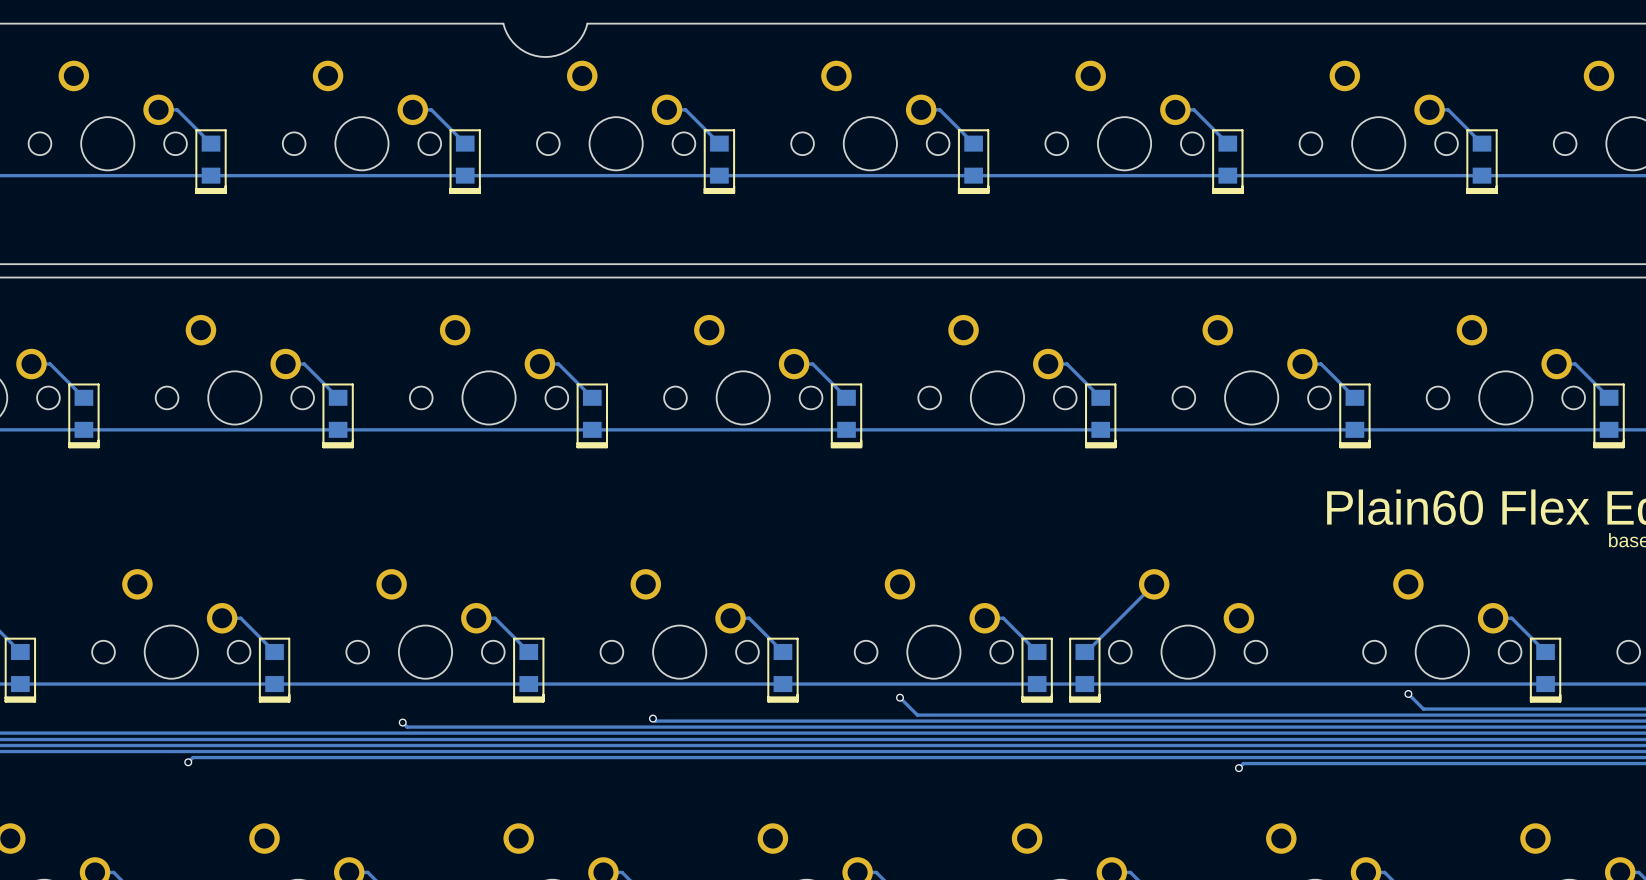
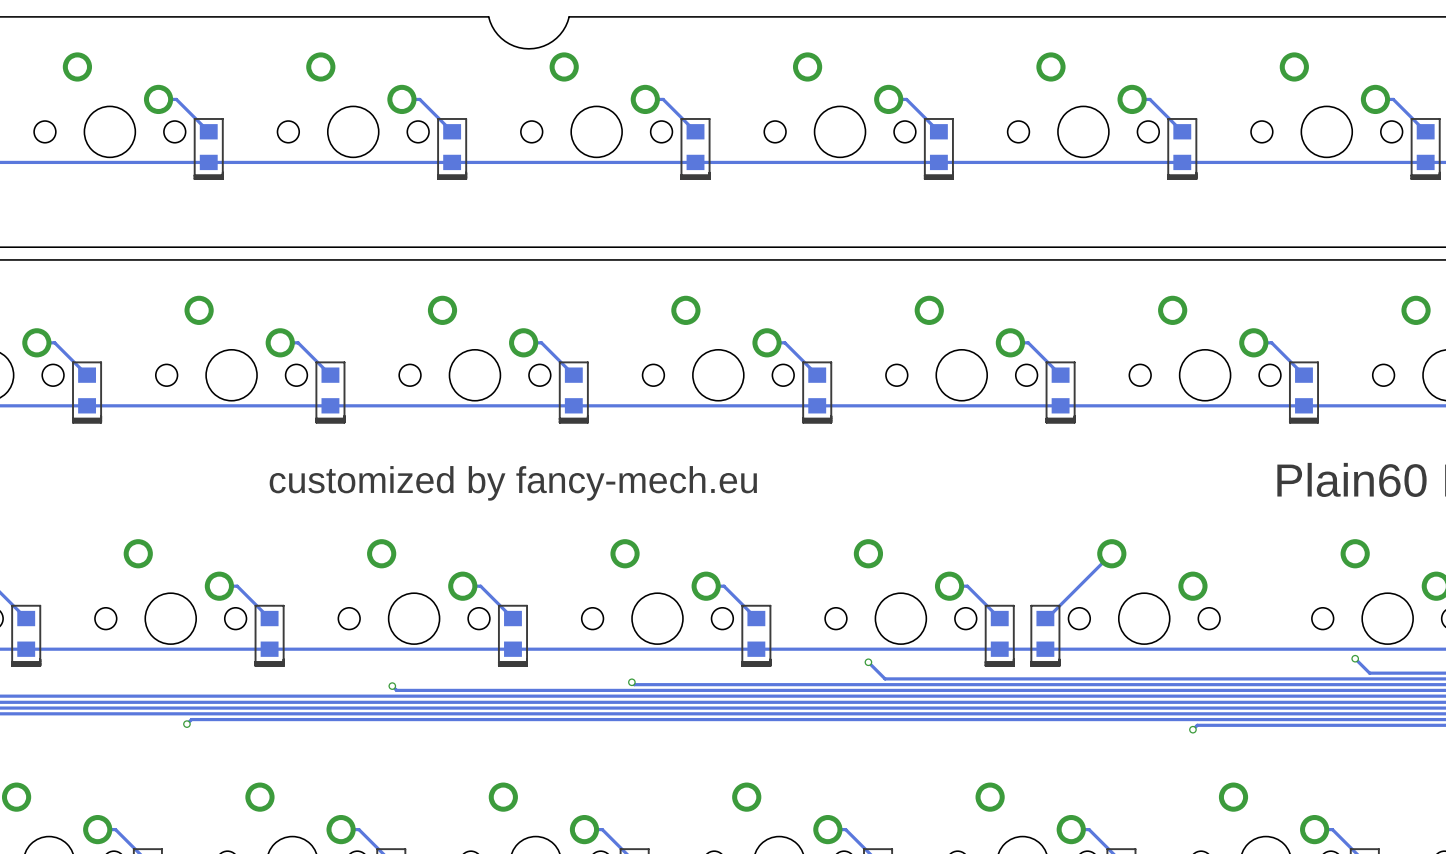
text: none -> customized by fancy-mech.eu (513, 483)

